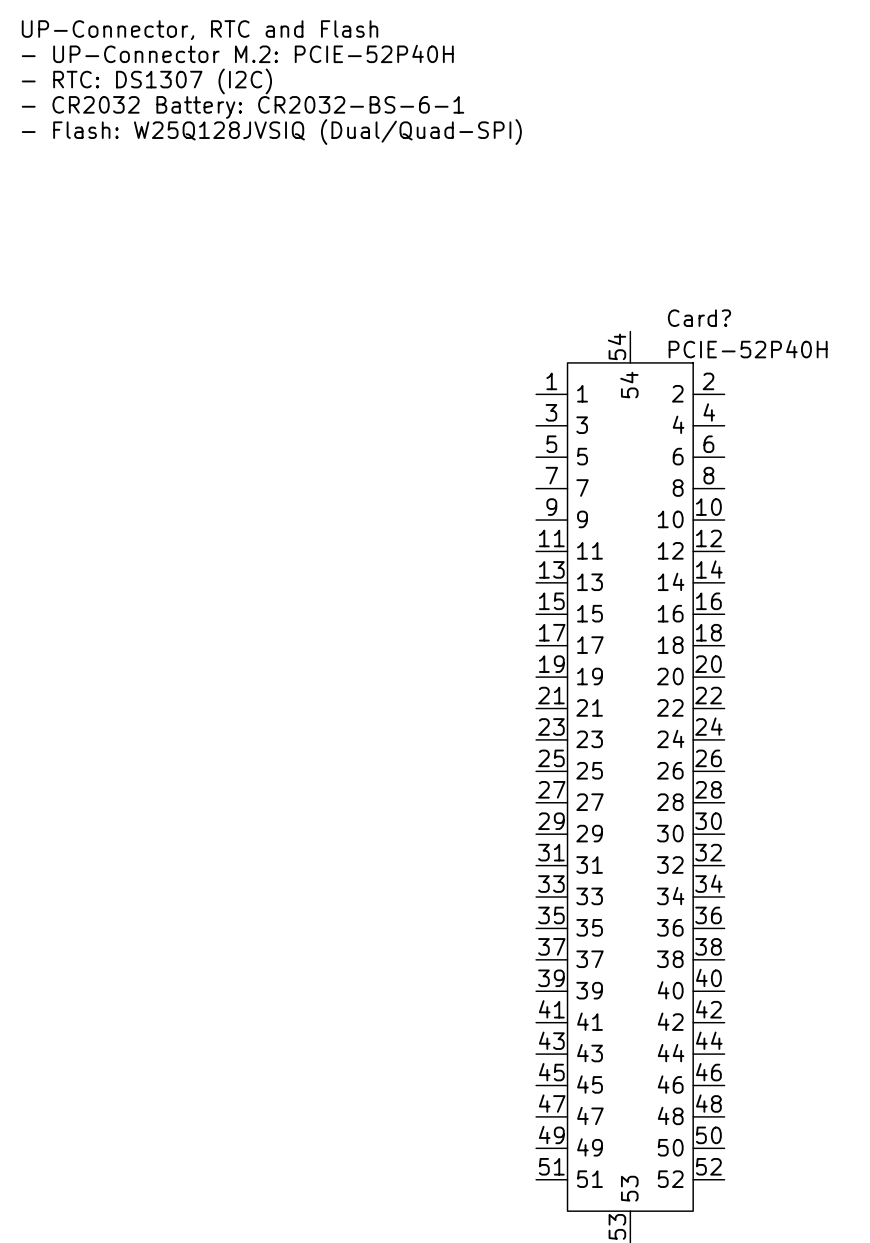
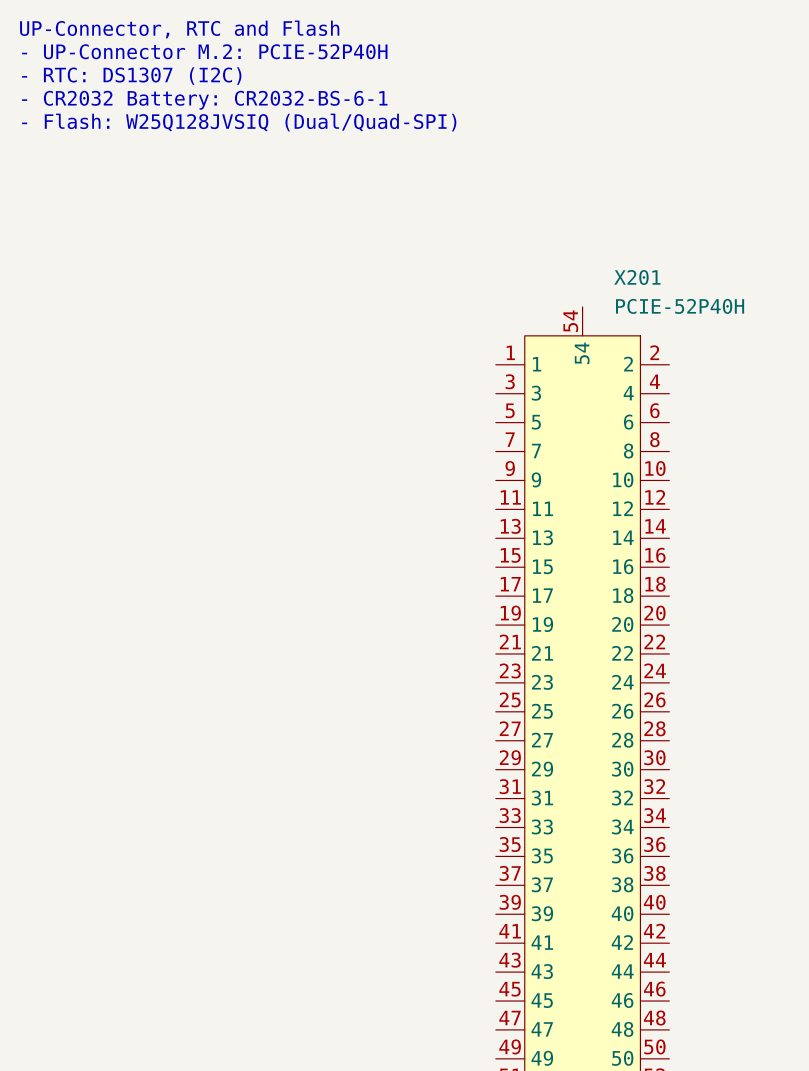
Card? name: Card? (699, 318) -> X201 (637, 277)
Card? value position: PCIE-52P40H (748, 349) -> PCIE-52P40H (680, 306)

